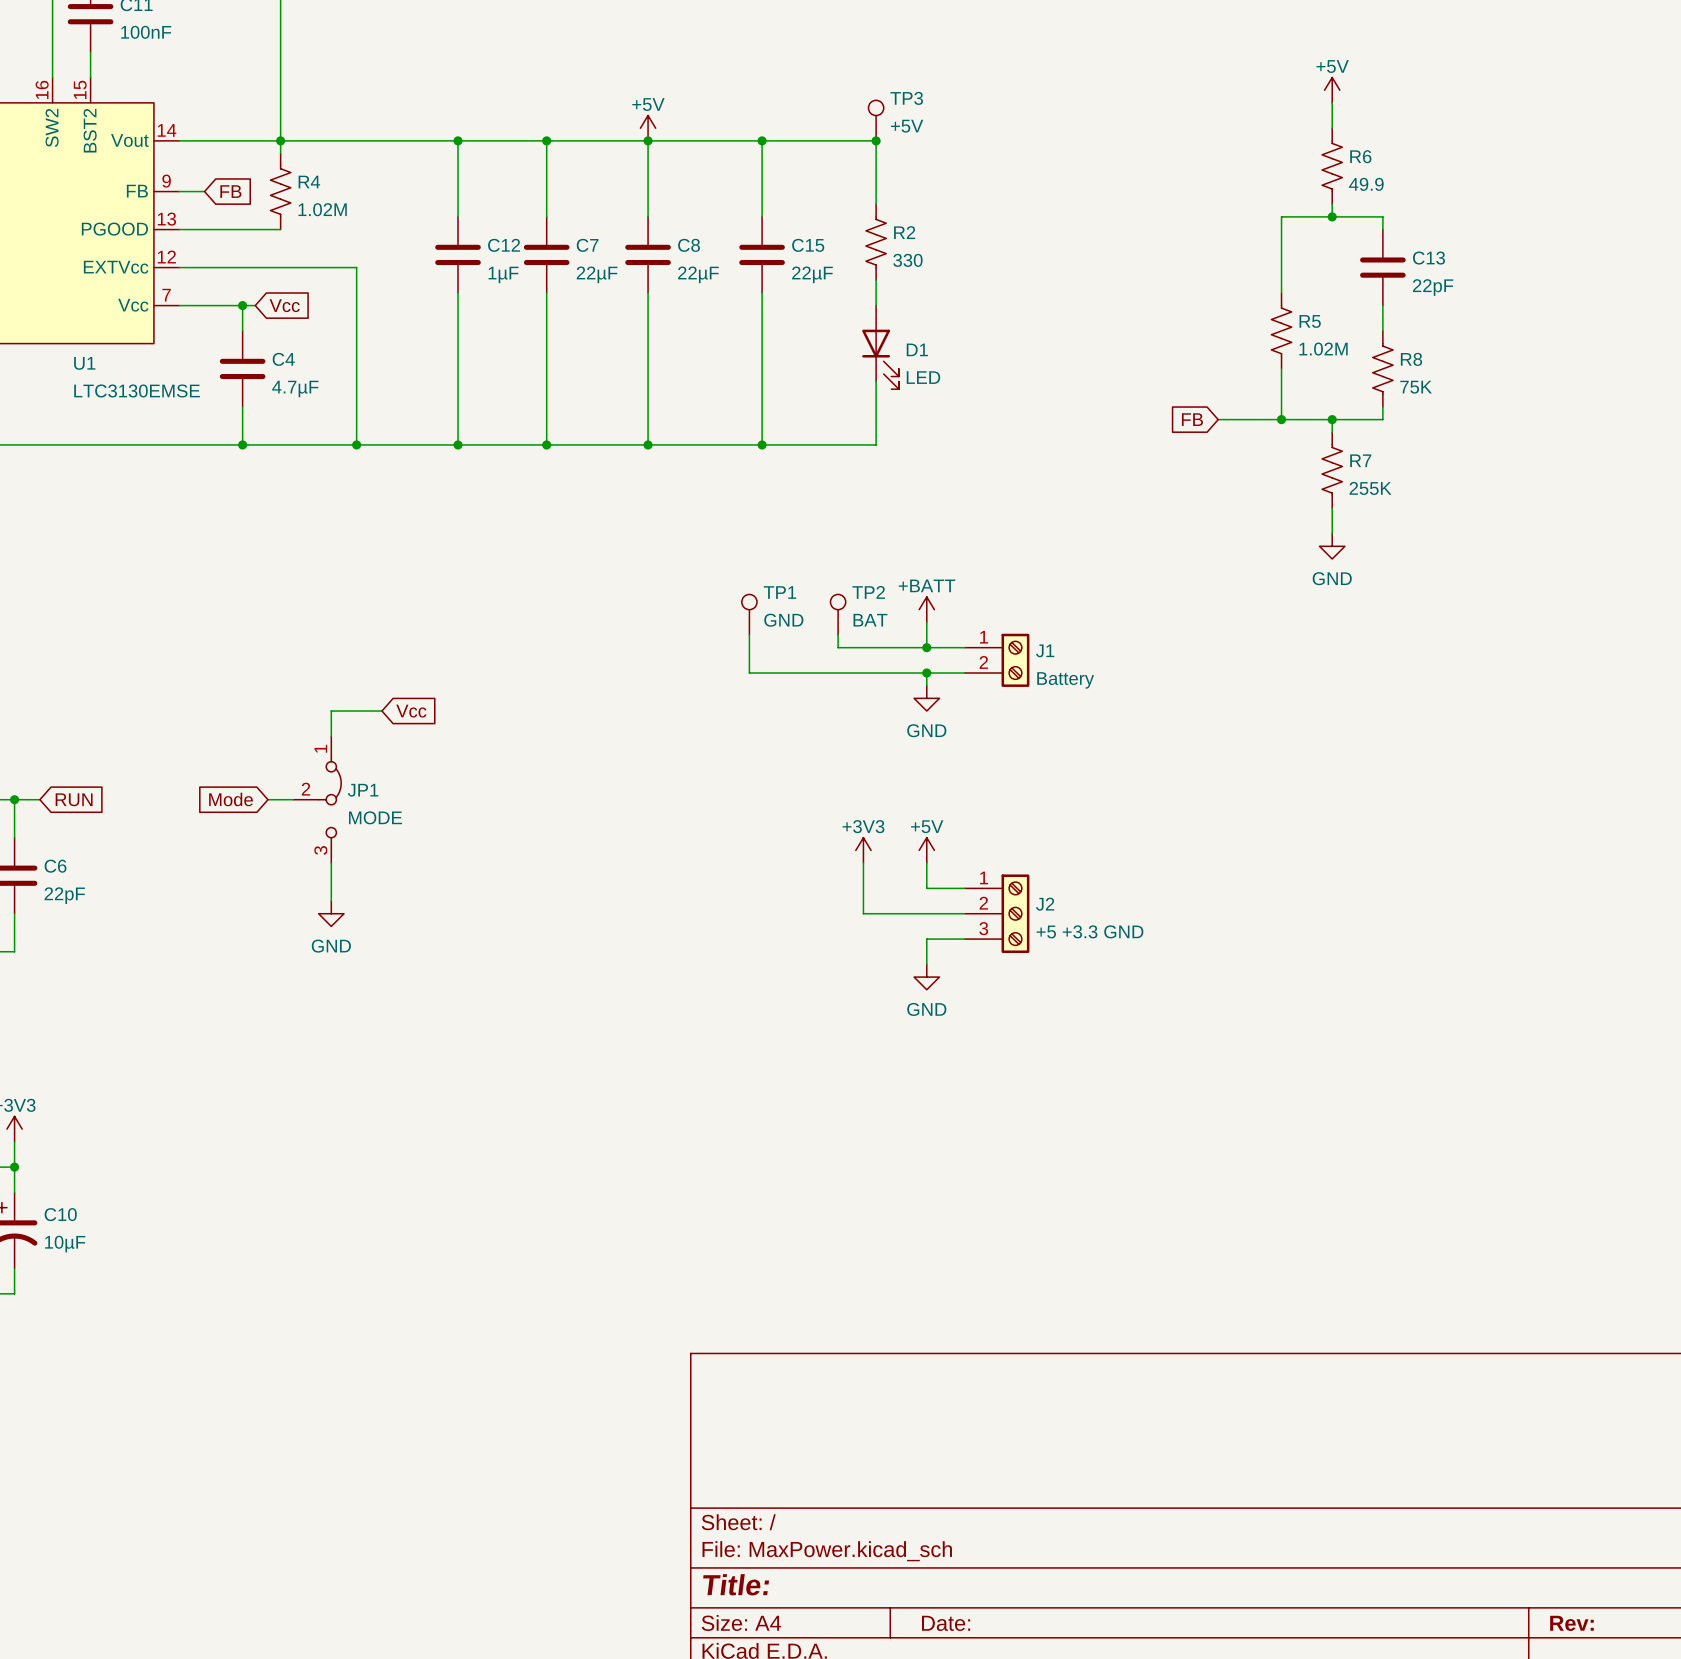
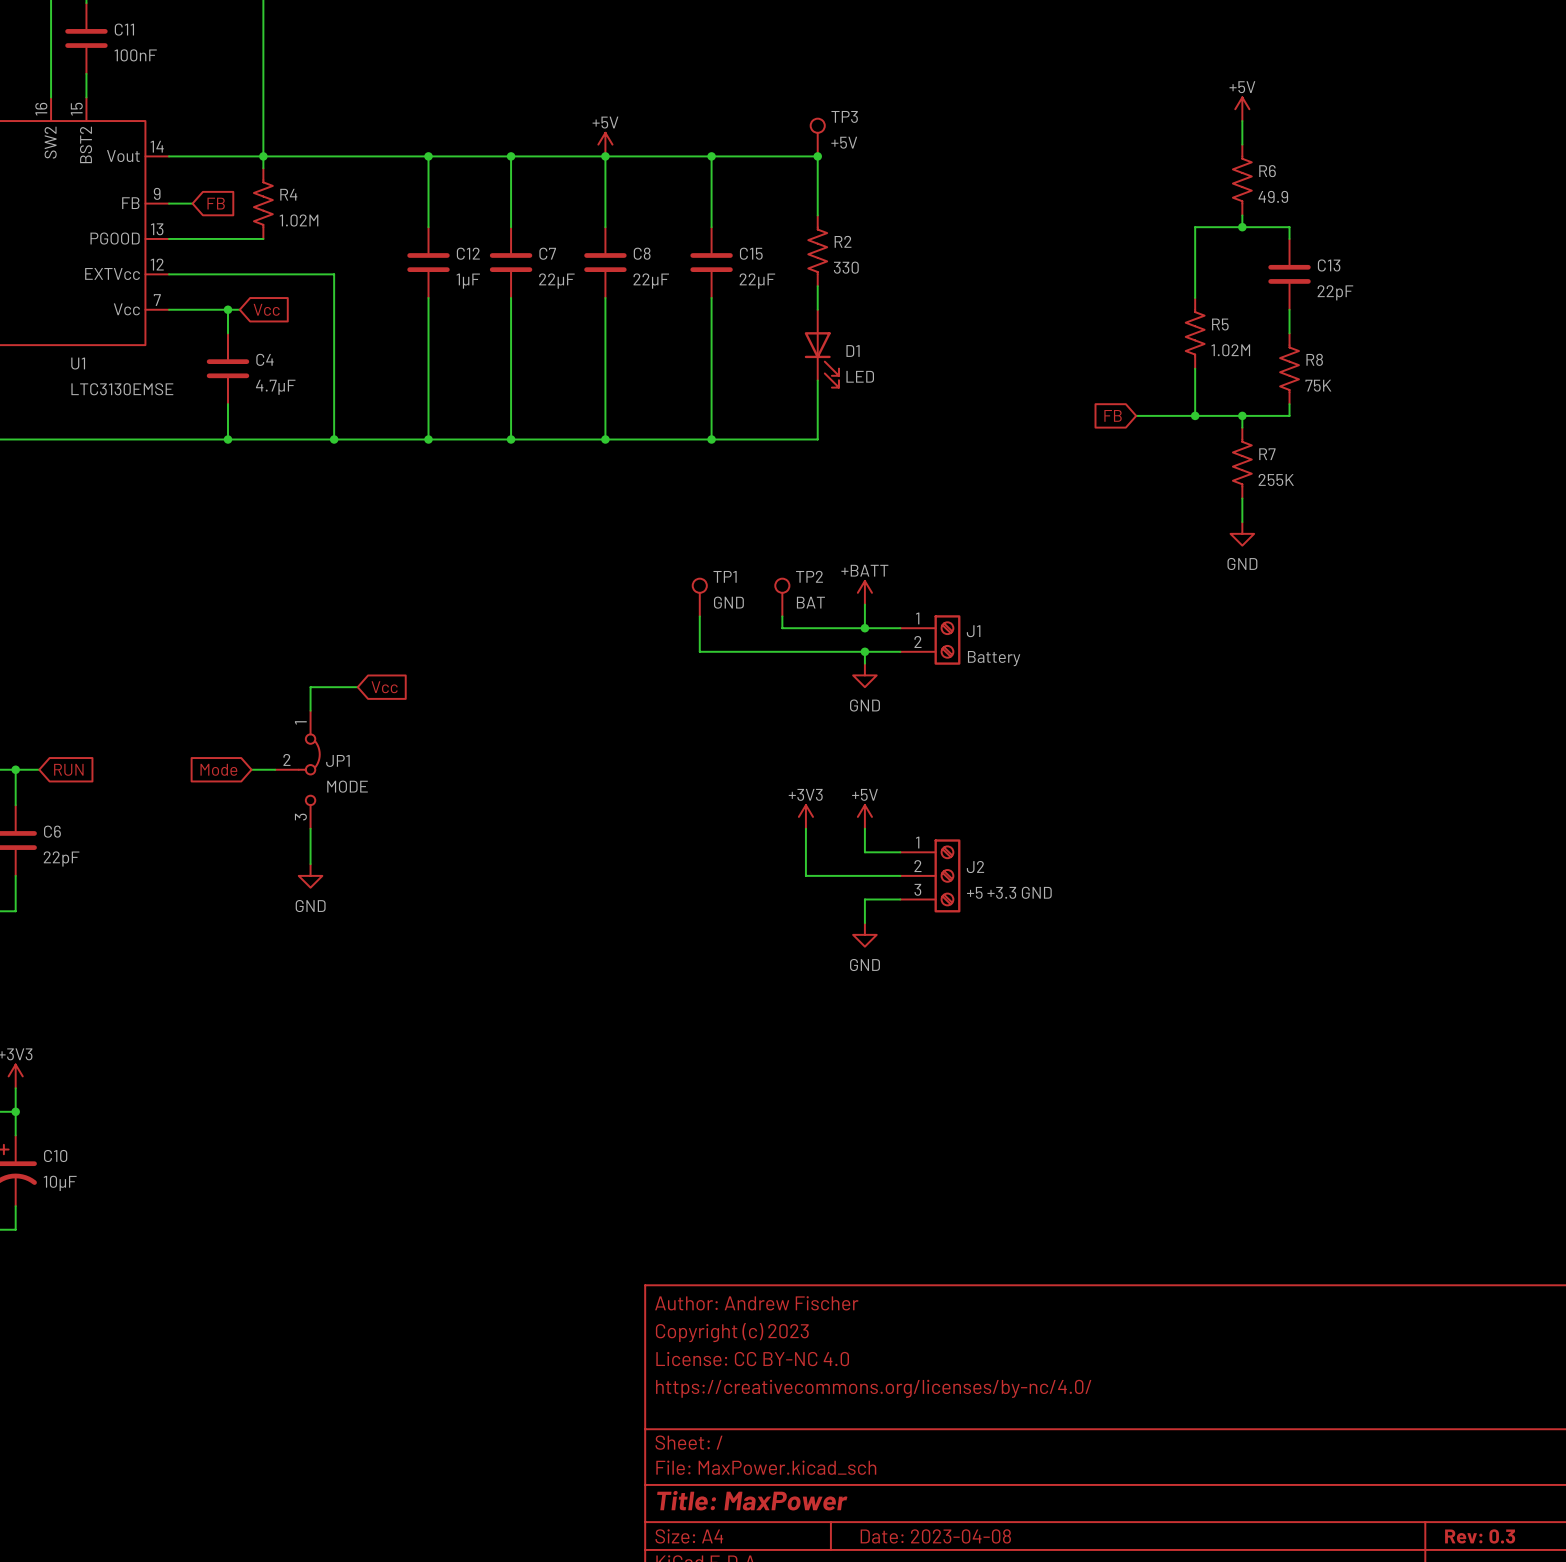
title block: none -> Author: Andrew Fischer (756, 1303)
title block: none -> Copyright (c) 2023 (732, 1332)
title block: none -> License: CC BY-NC 4.0 (752, 1359)
title block: none -> https://creativecommons.org/licenses/by-nc/4.0/ (873, 1388)
title block: Title: (736, 1584) -> Title: MaxPower (752, 1500)
title block: Date: (946, 1623) -> Date: 2023-04-08 (935, 1536)
title block: Rev: (1571, 1623) -> Rev: 0.3 (1480, 1536)

